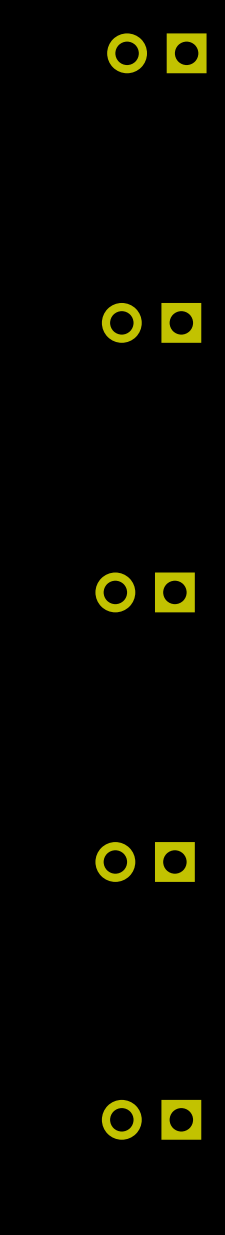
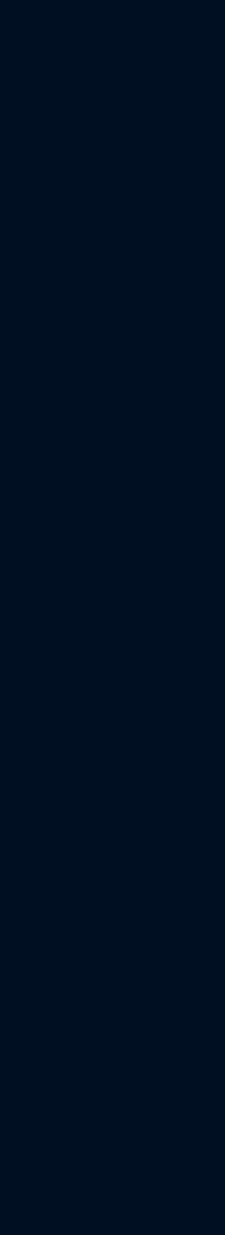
part: (156, 53) -> none
part: (151, 322) -> none
part: (145, 592) -> none
part: (145, 861) -> none
part: (151, 1119) -> none

